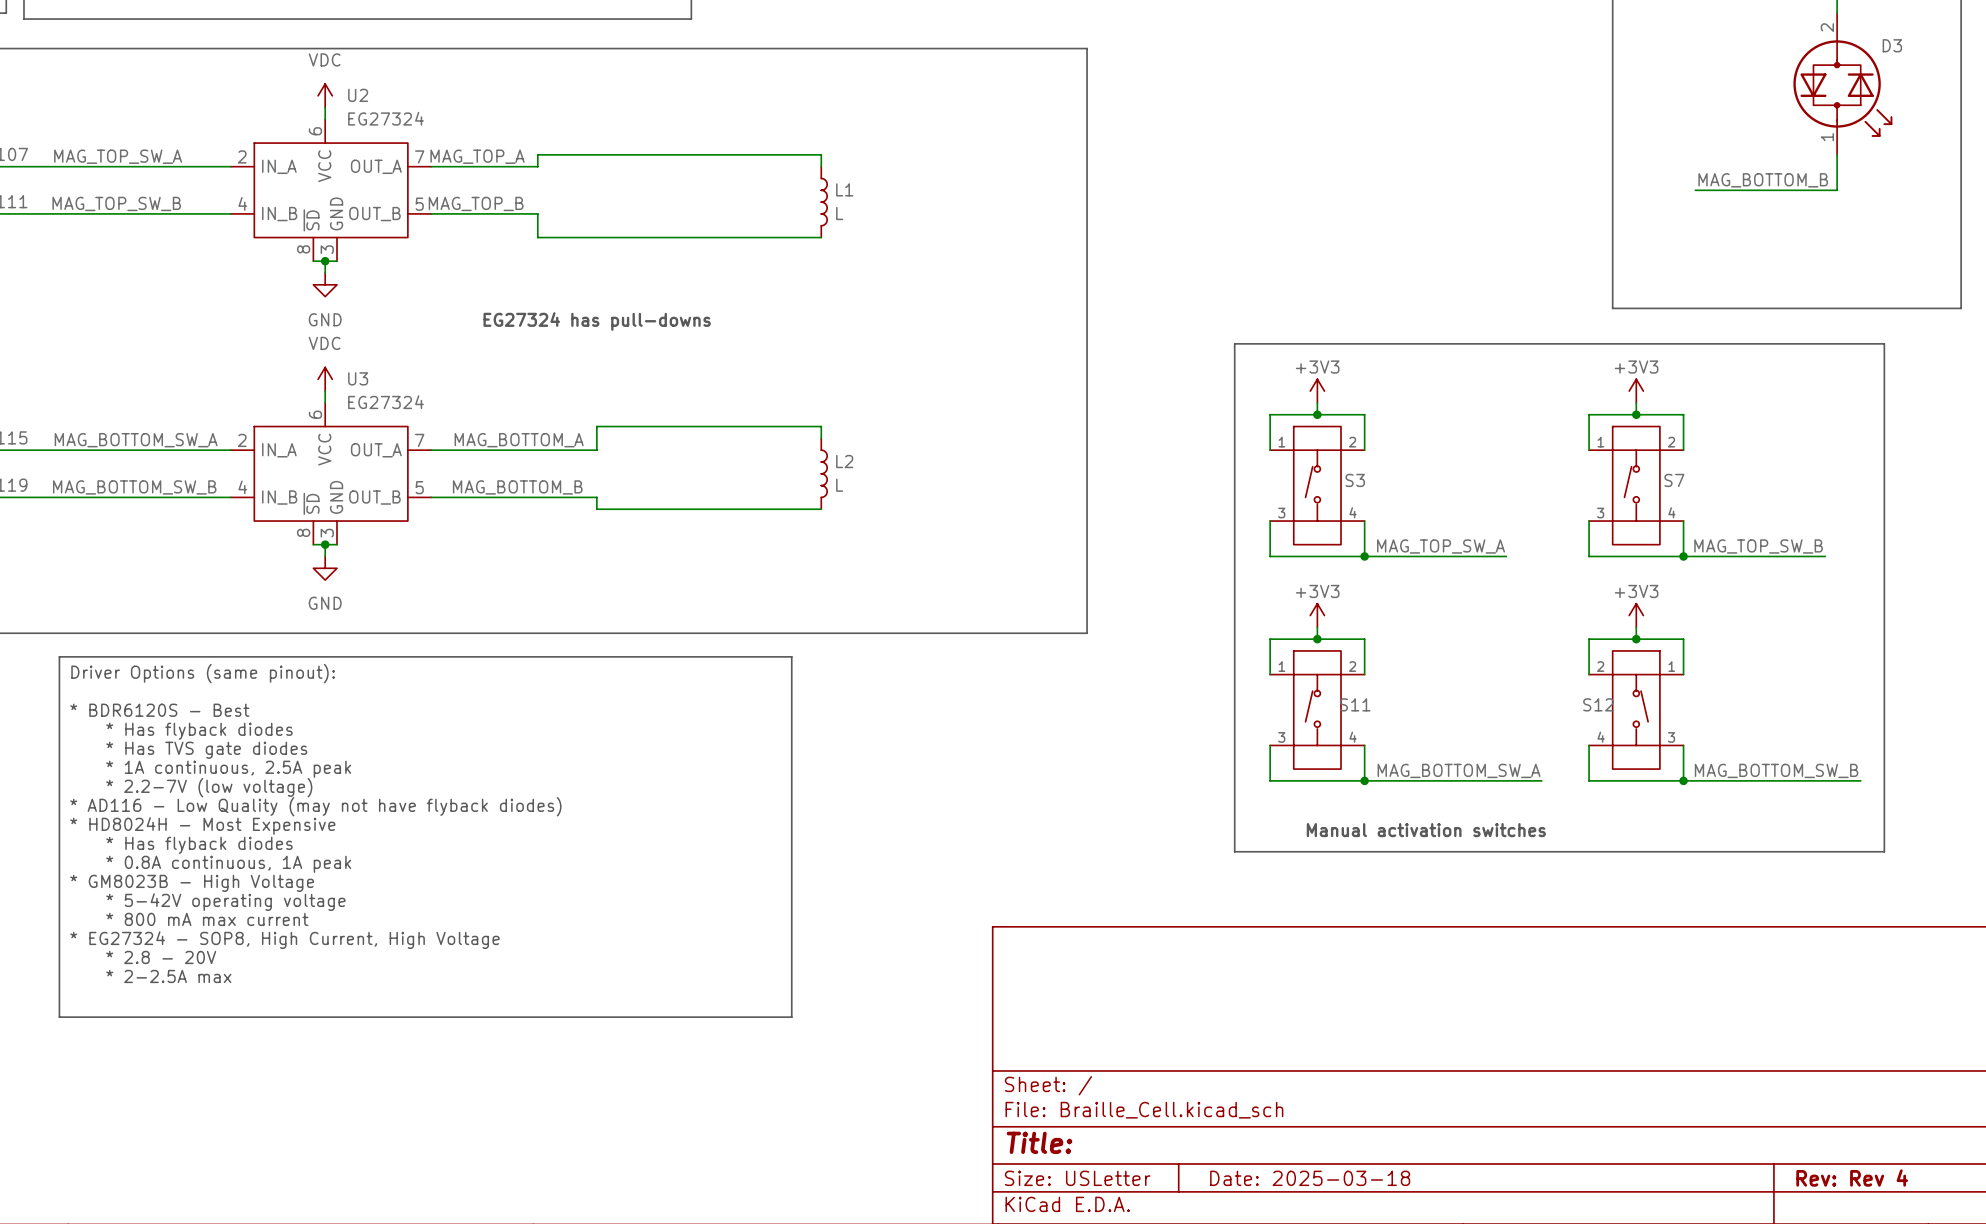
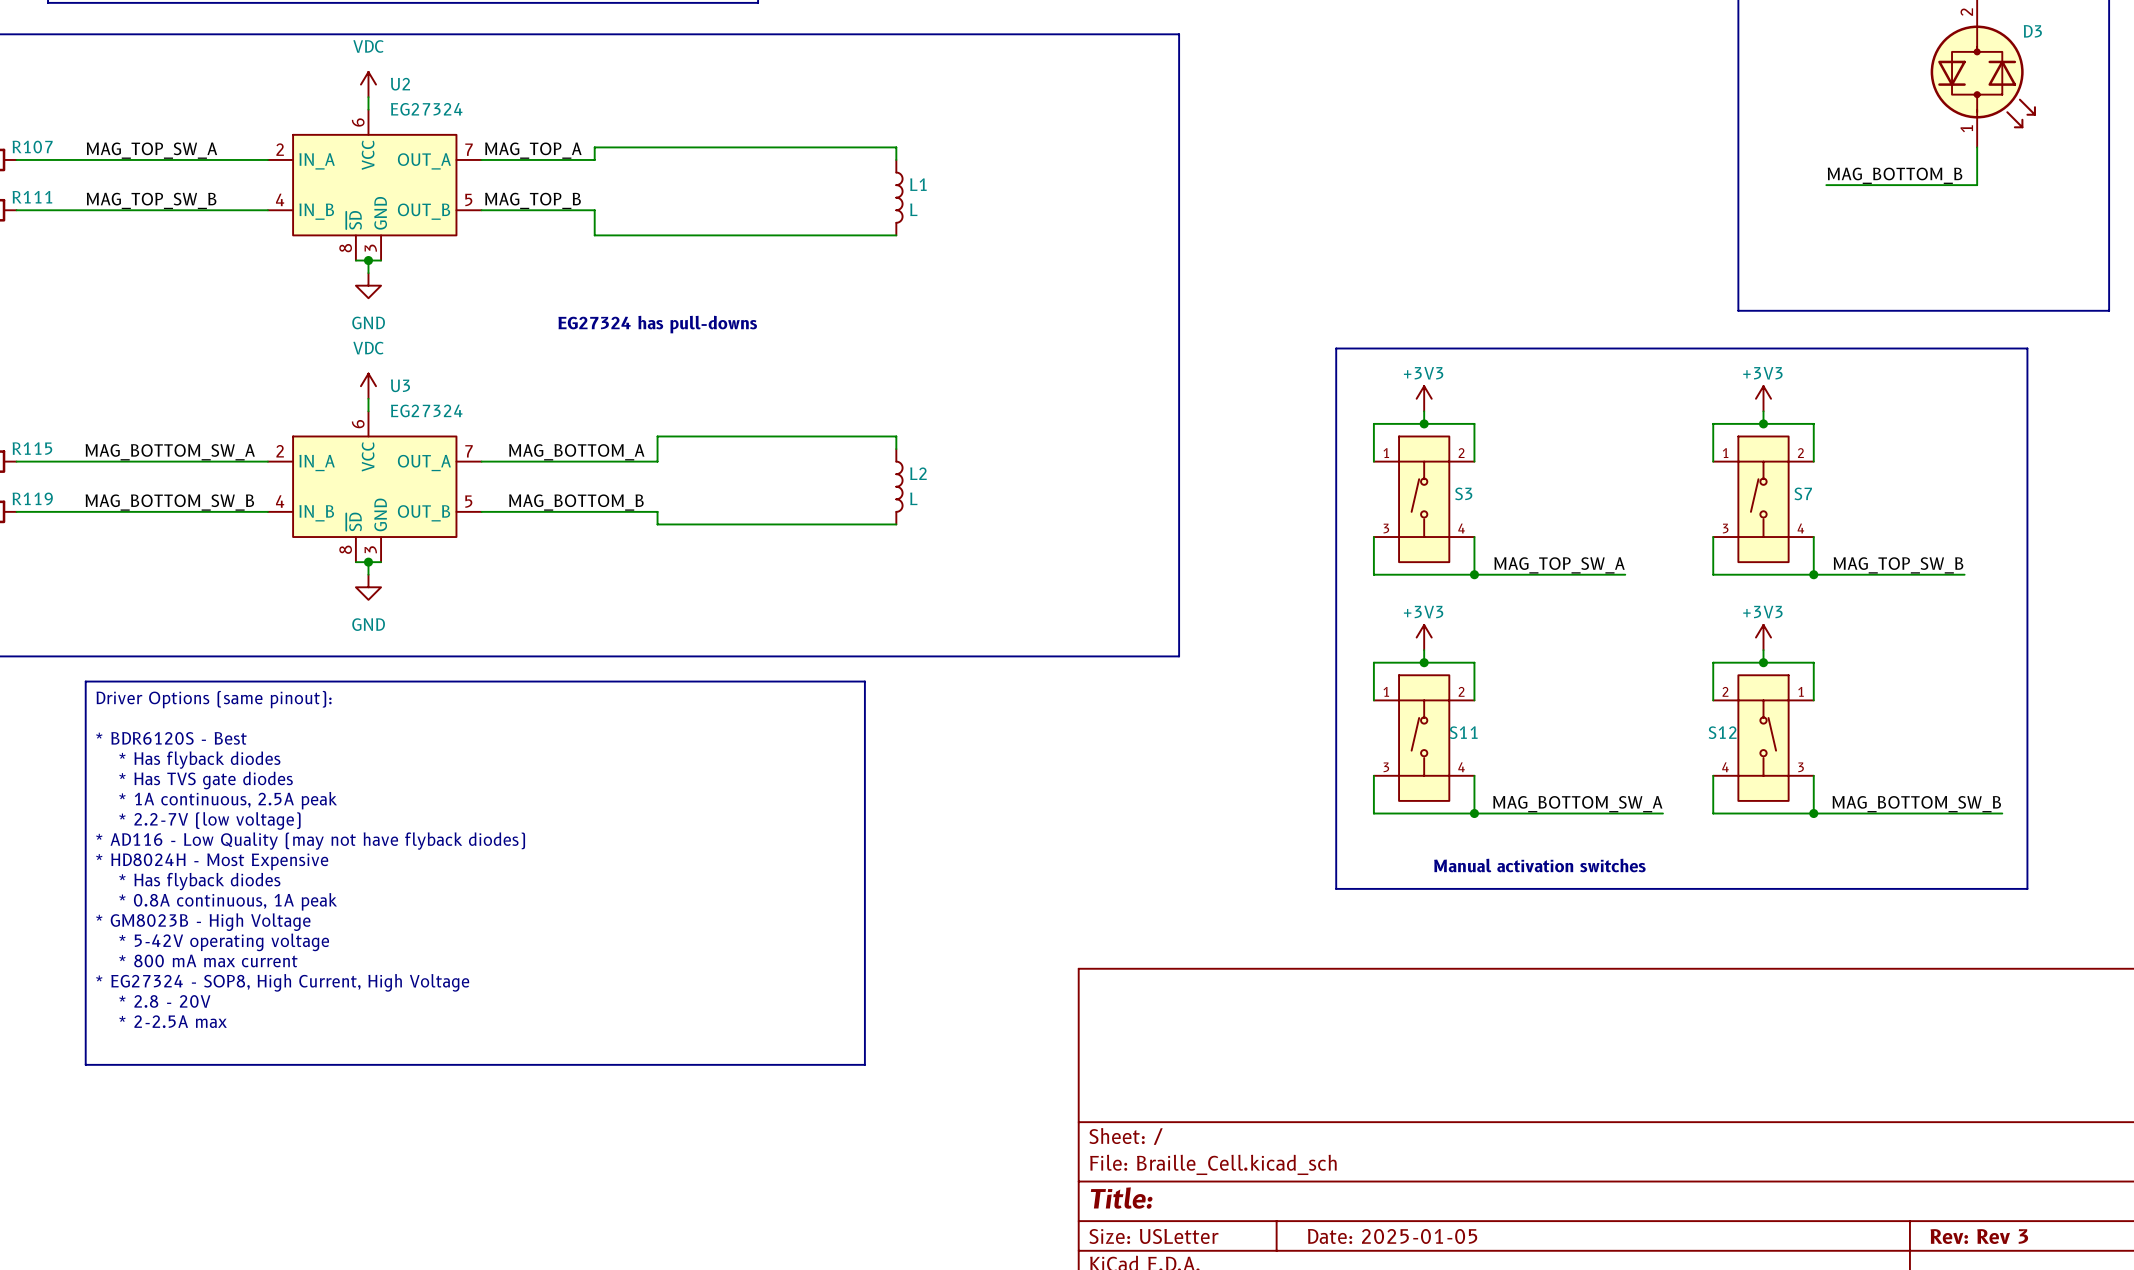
title block: Date: 2025-03-18 (1310, 1178) -> Date: 2025-01-05 (1392, 1236)
title block: Rev: Rev 4 (1852, 1178) -> Rev: Rev 3 (1979, 1236)

